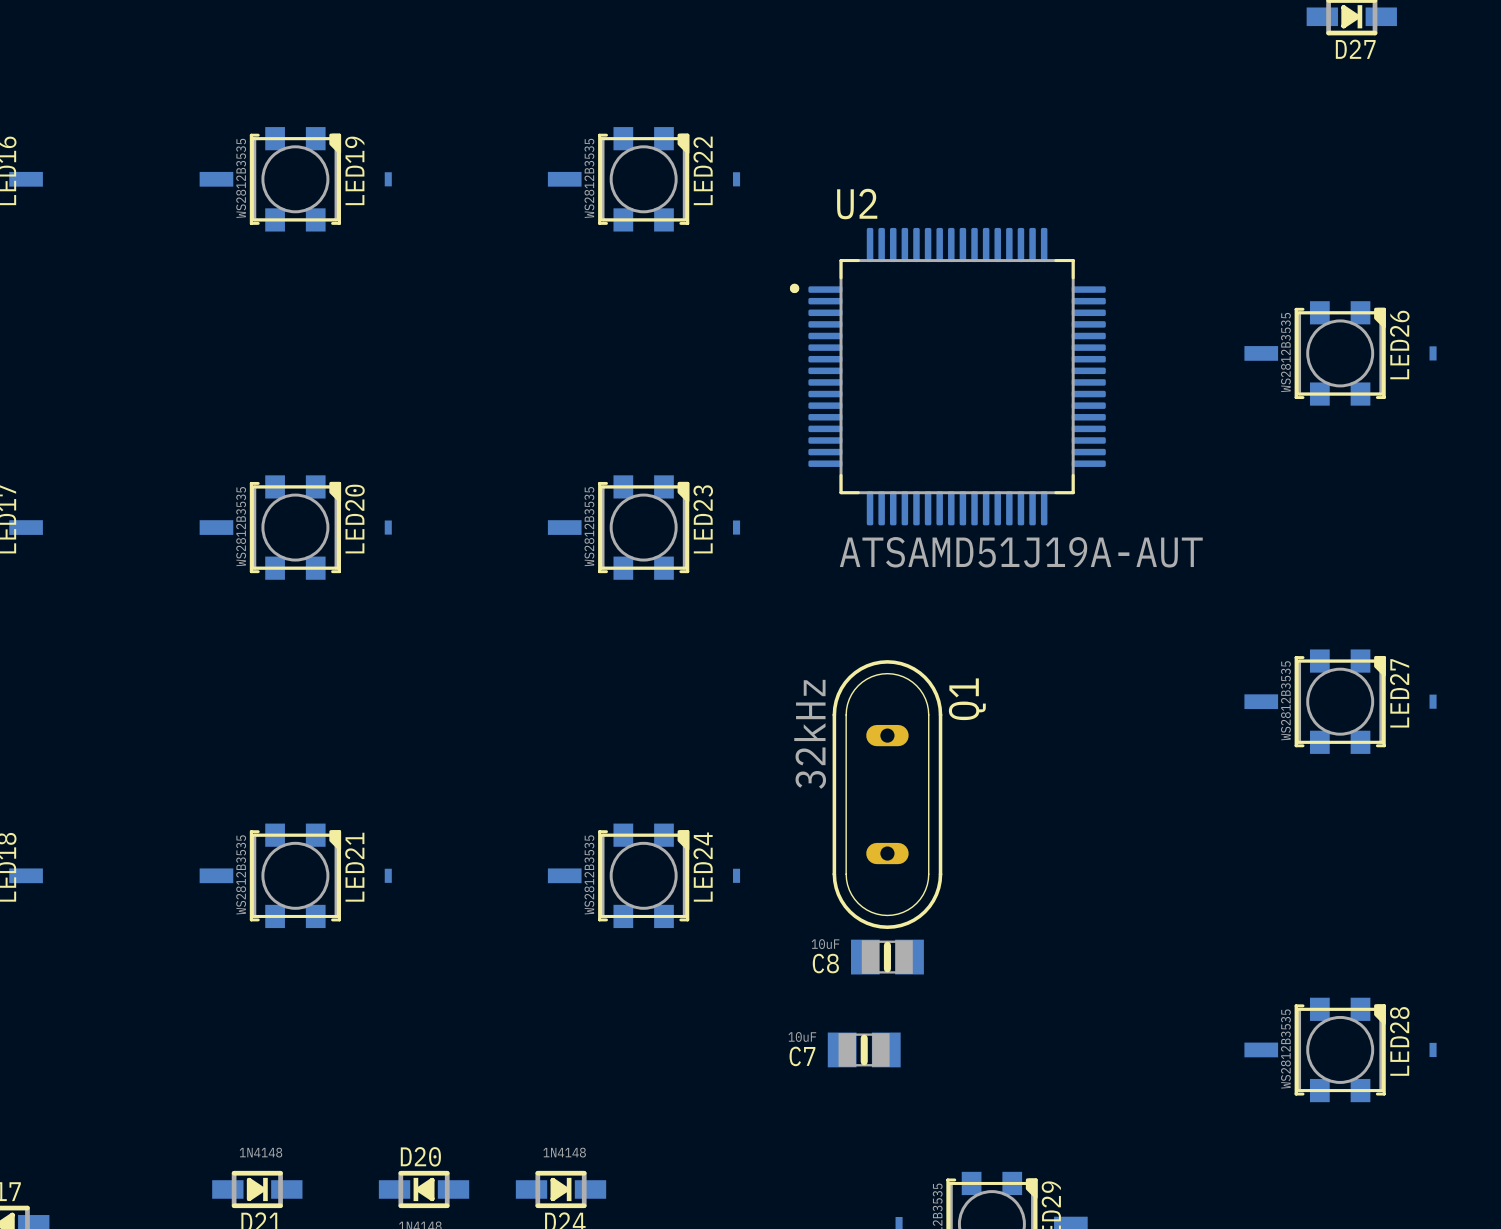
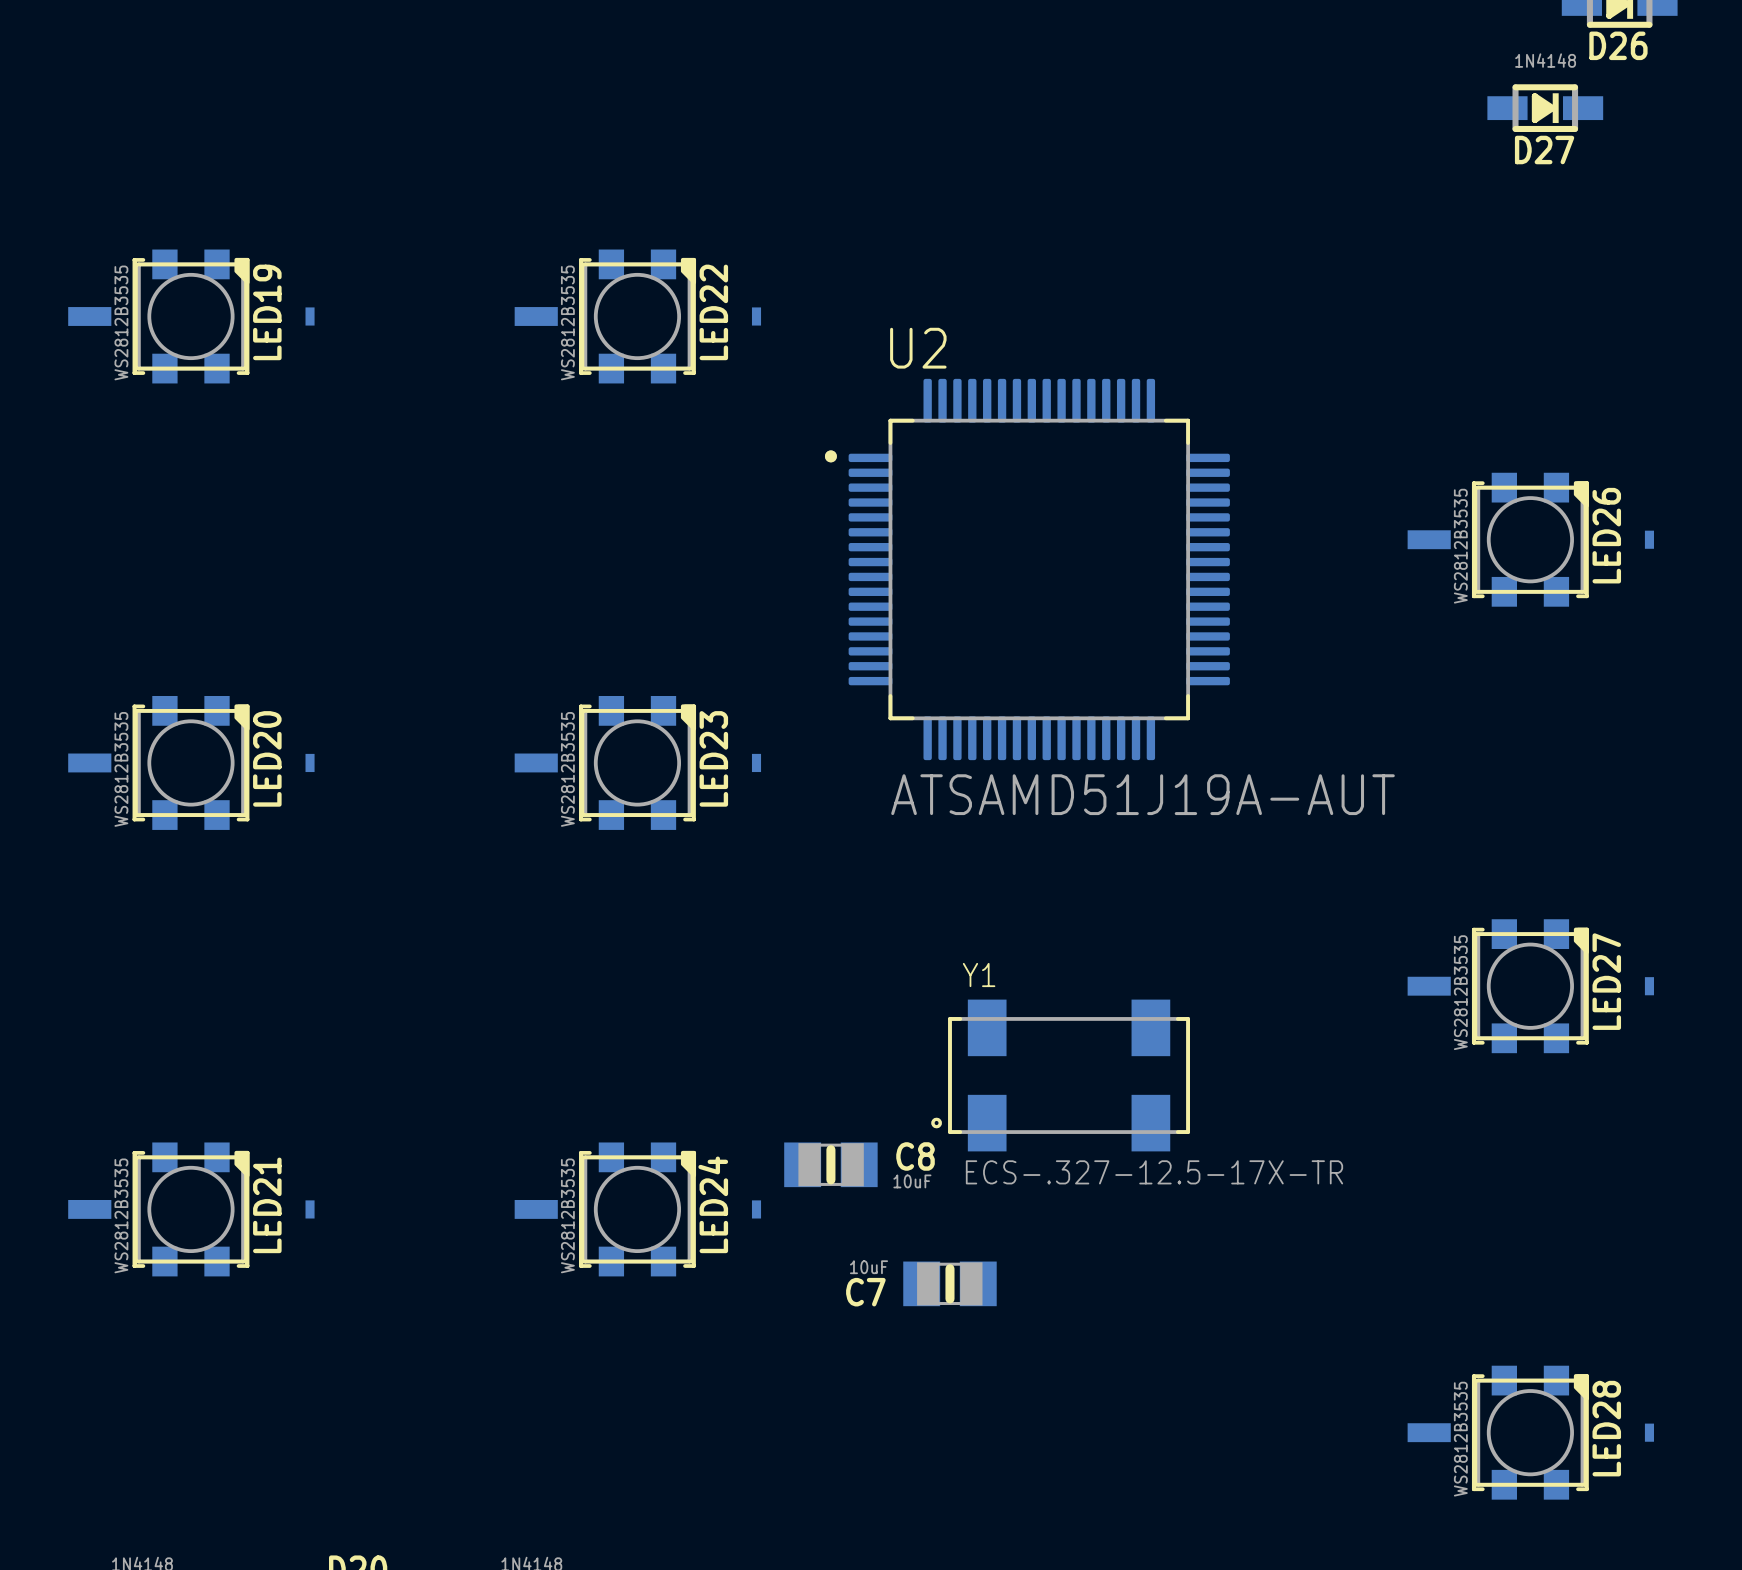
Y1: none -> ECS-.327-12.5-17X-TR (1060, 1075)
Q1: 32kHz (887, 794) -> none
C8 value position: 10uF (825, 944) -> 10uF (912, 1181)
C8 position: (887, 957) -> (830, 1164)
C8 name position: C8 (825, 963) -> C8 (915, 1156)
C7 position: (864, 1049) -> (949, 1283)

